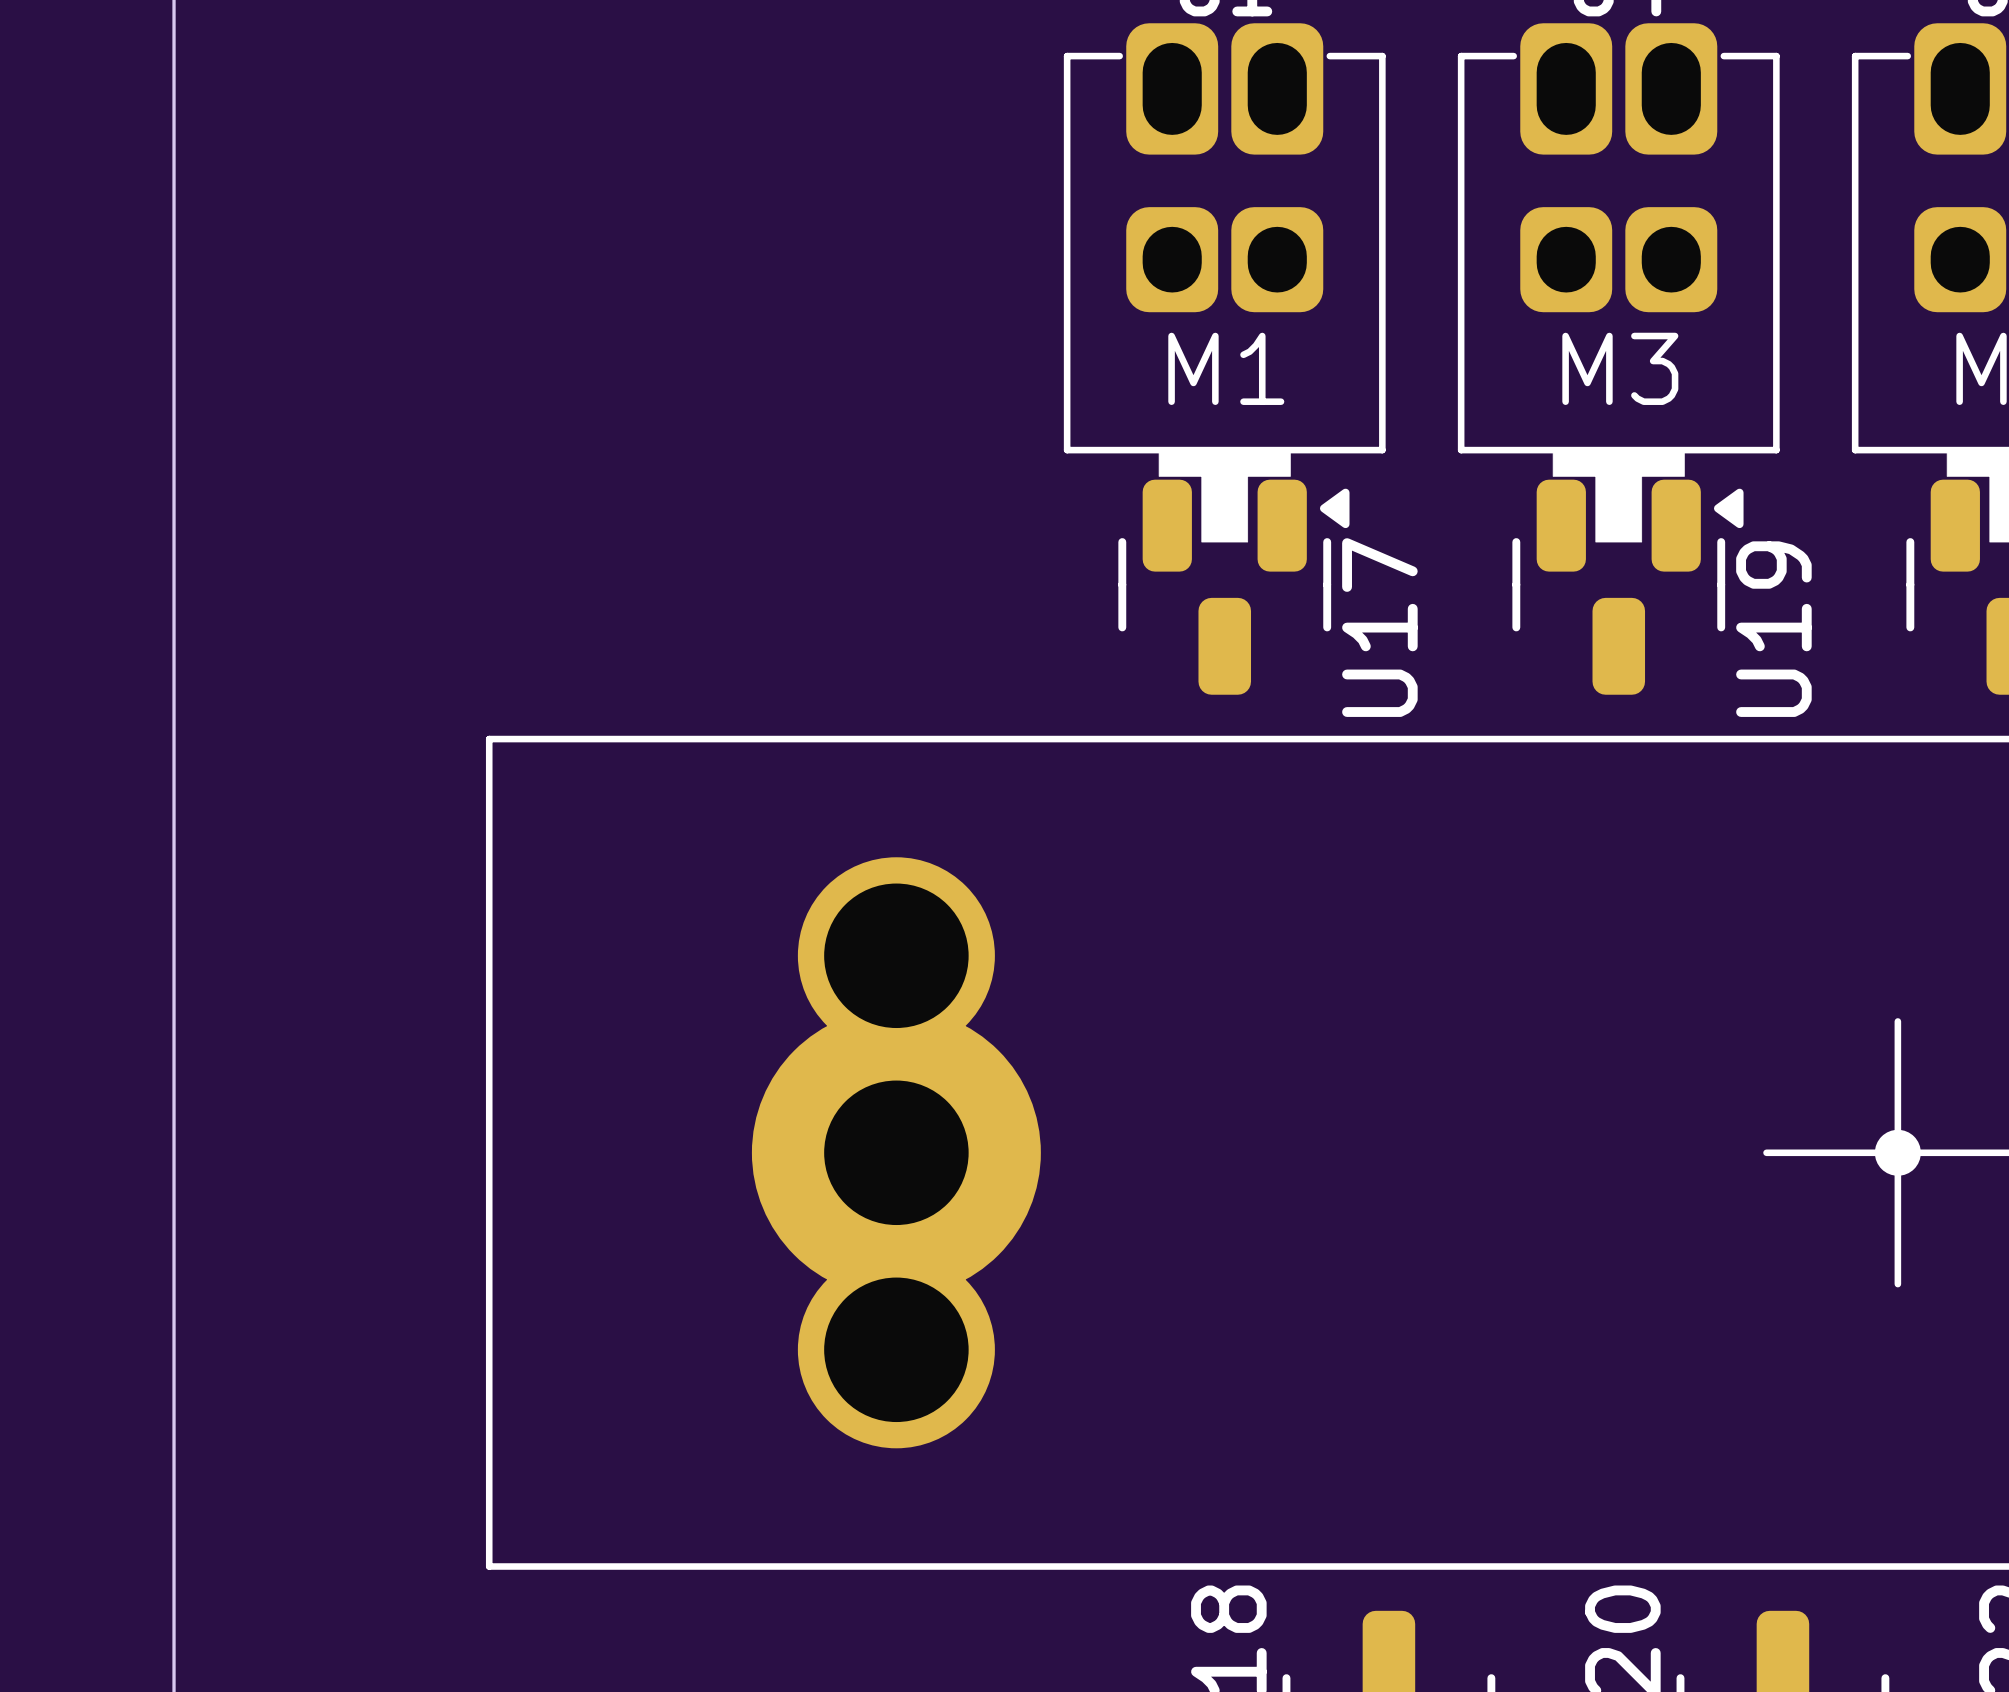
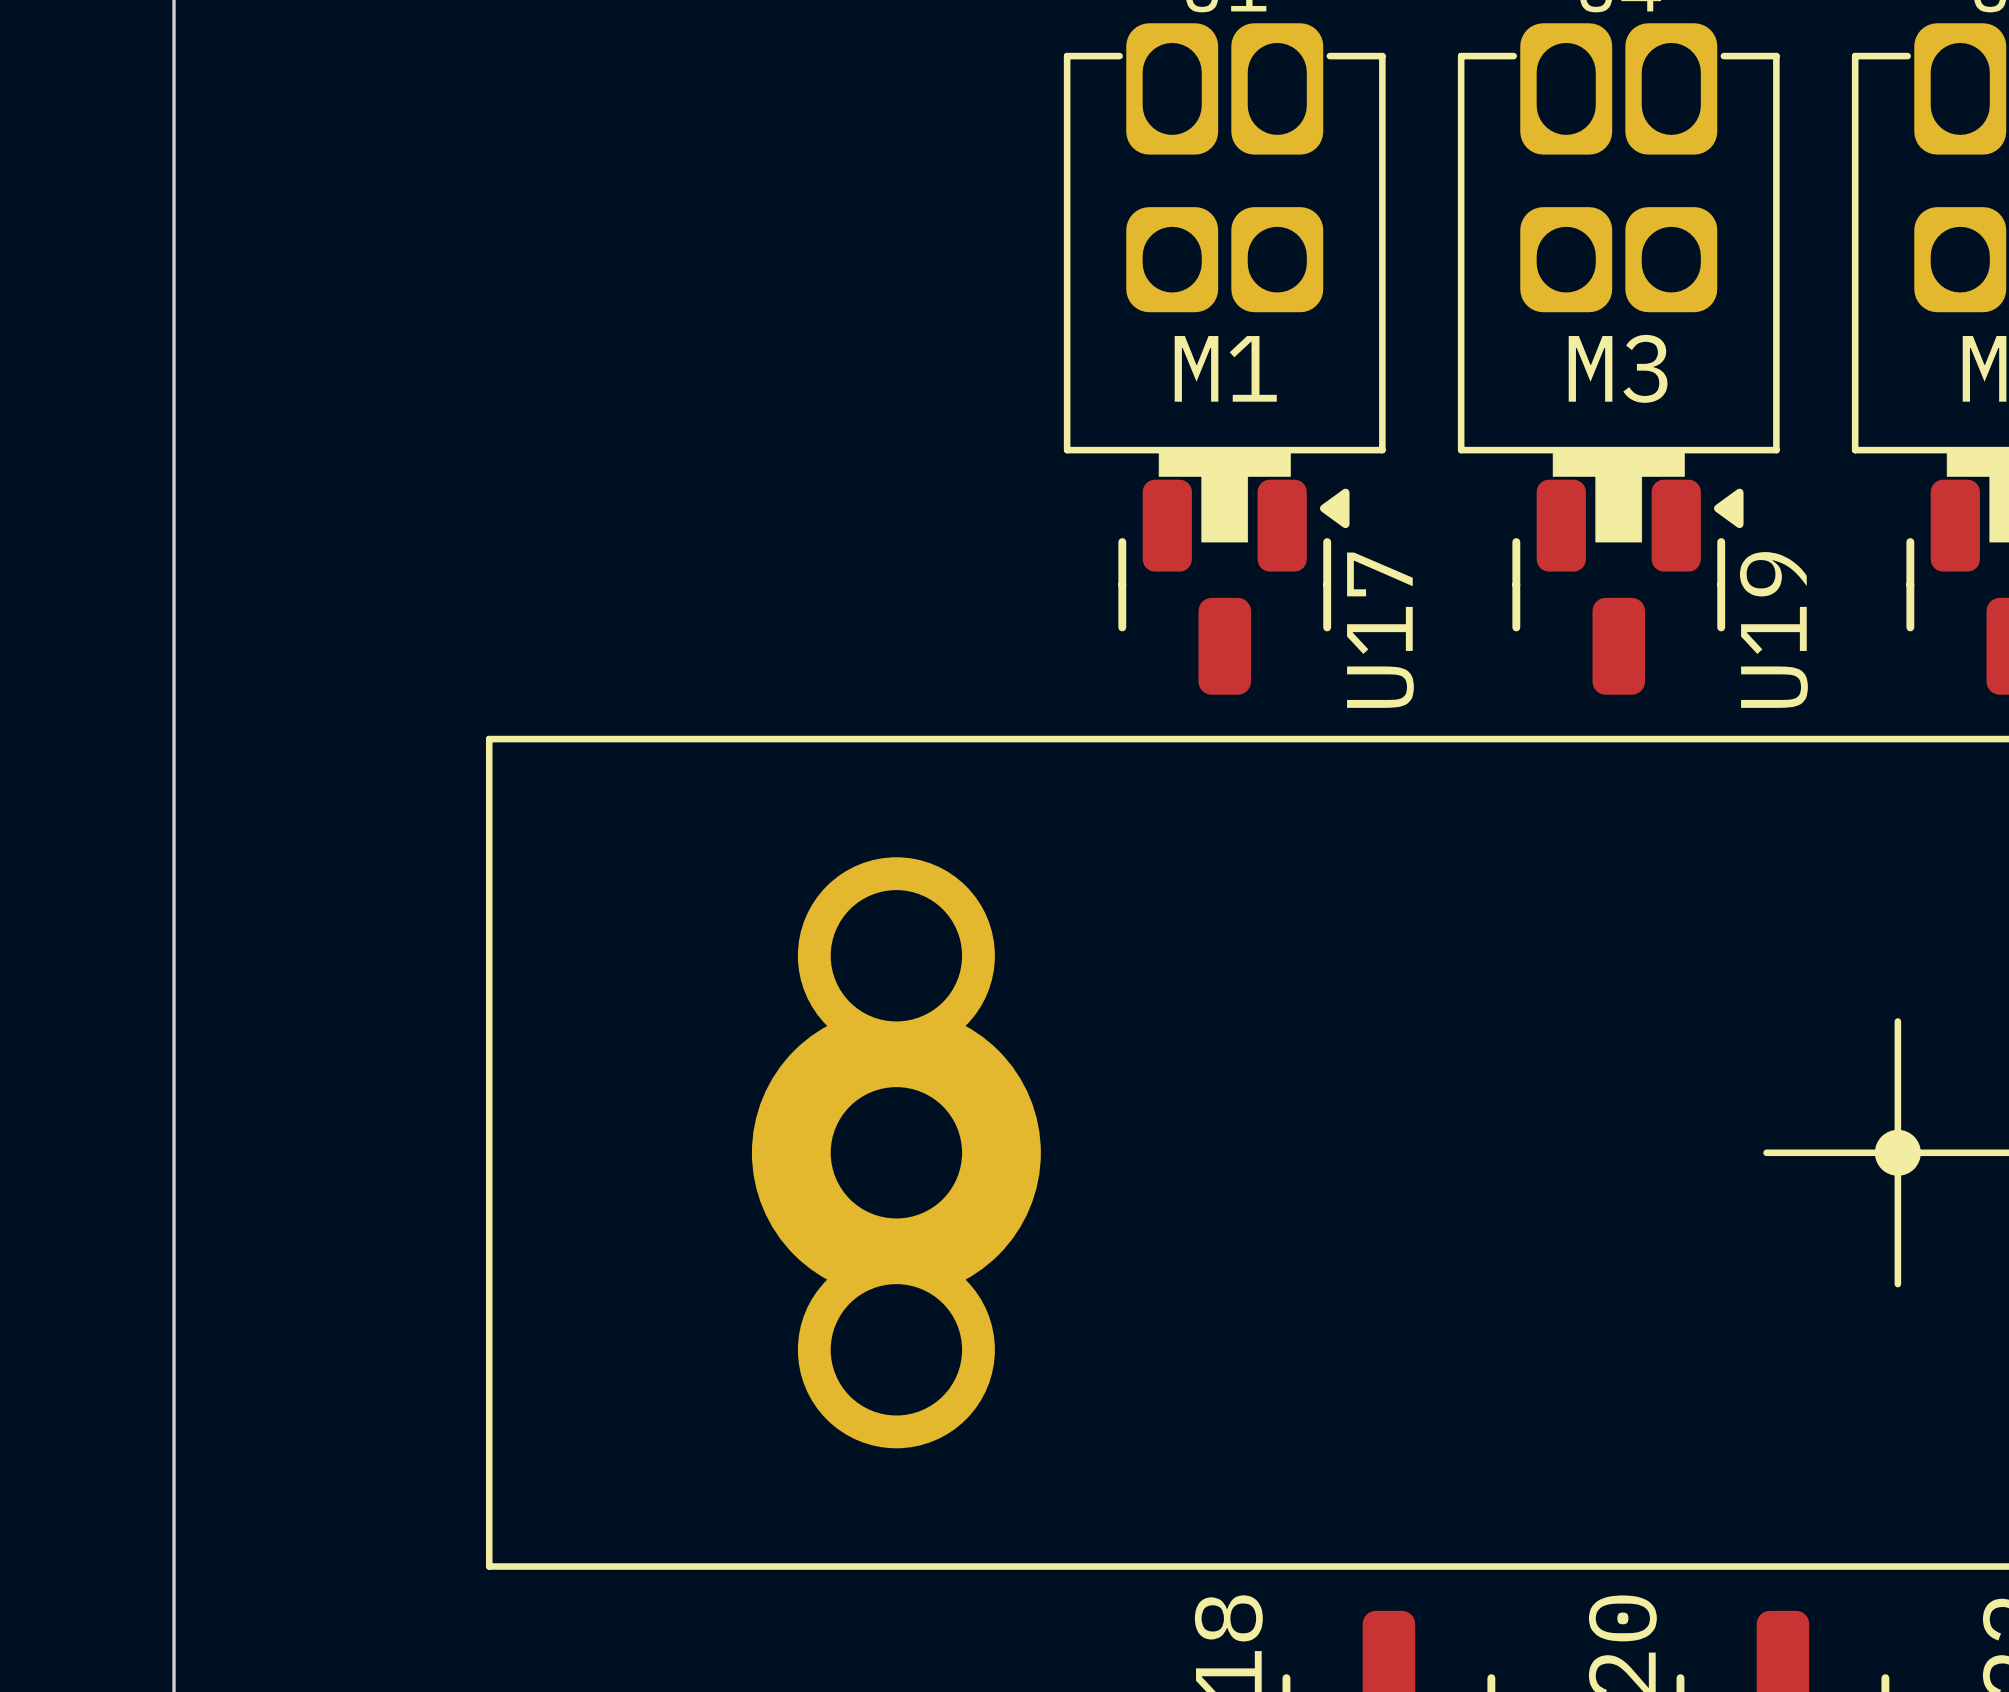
part footprint: [751, 857, 1041, 1449] -> [751, 857, 1041, 1449]

